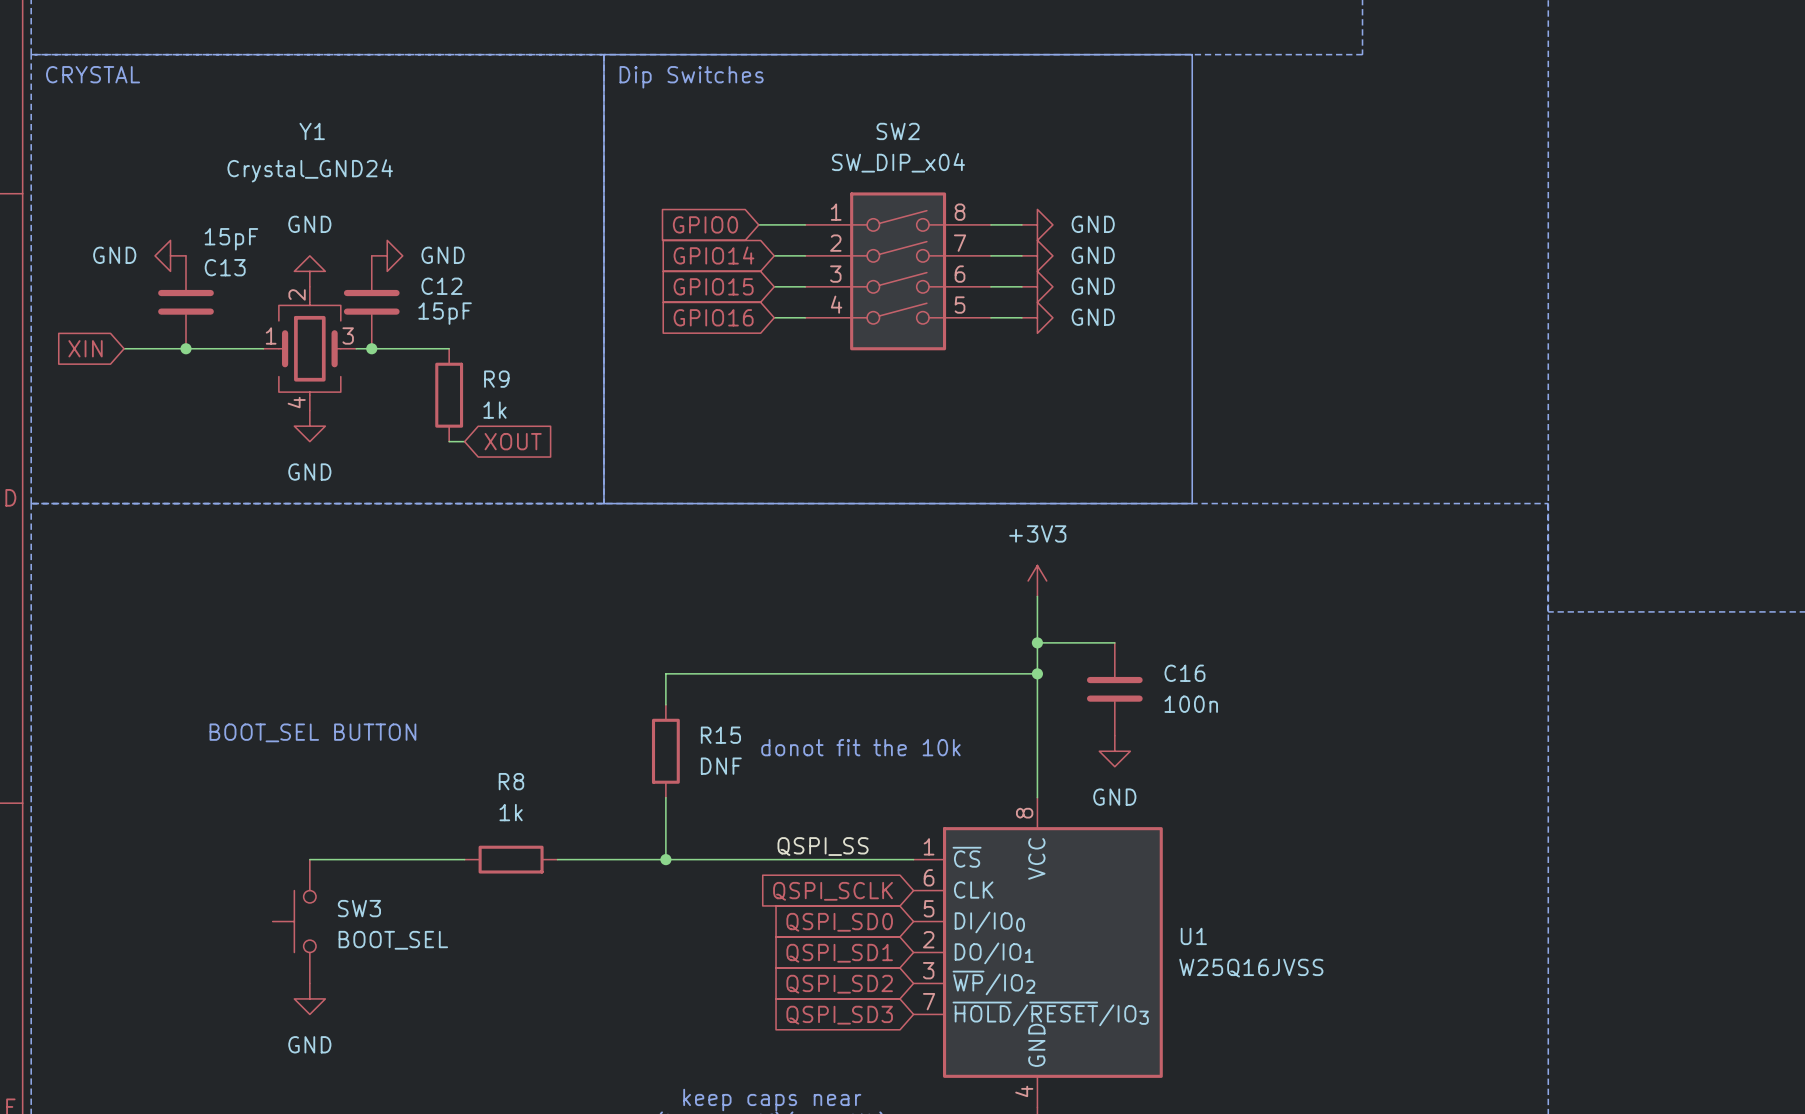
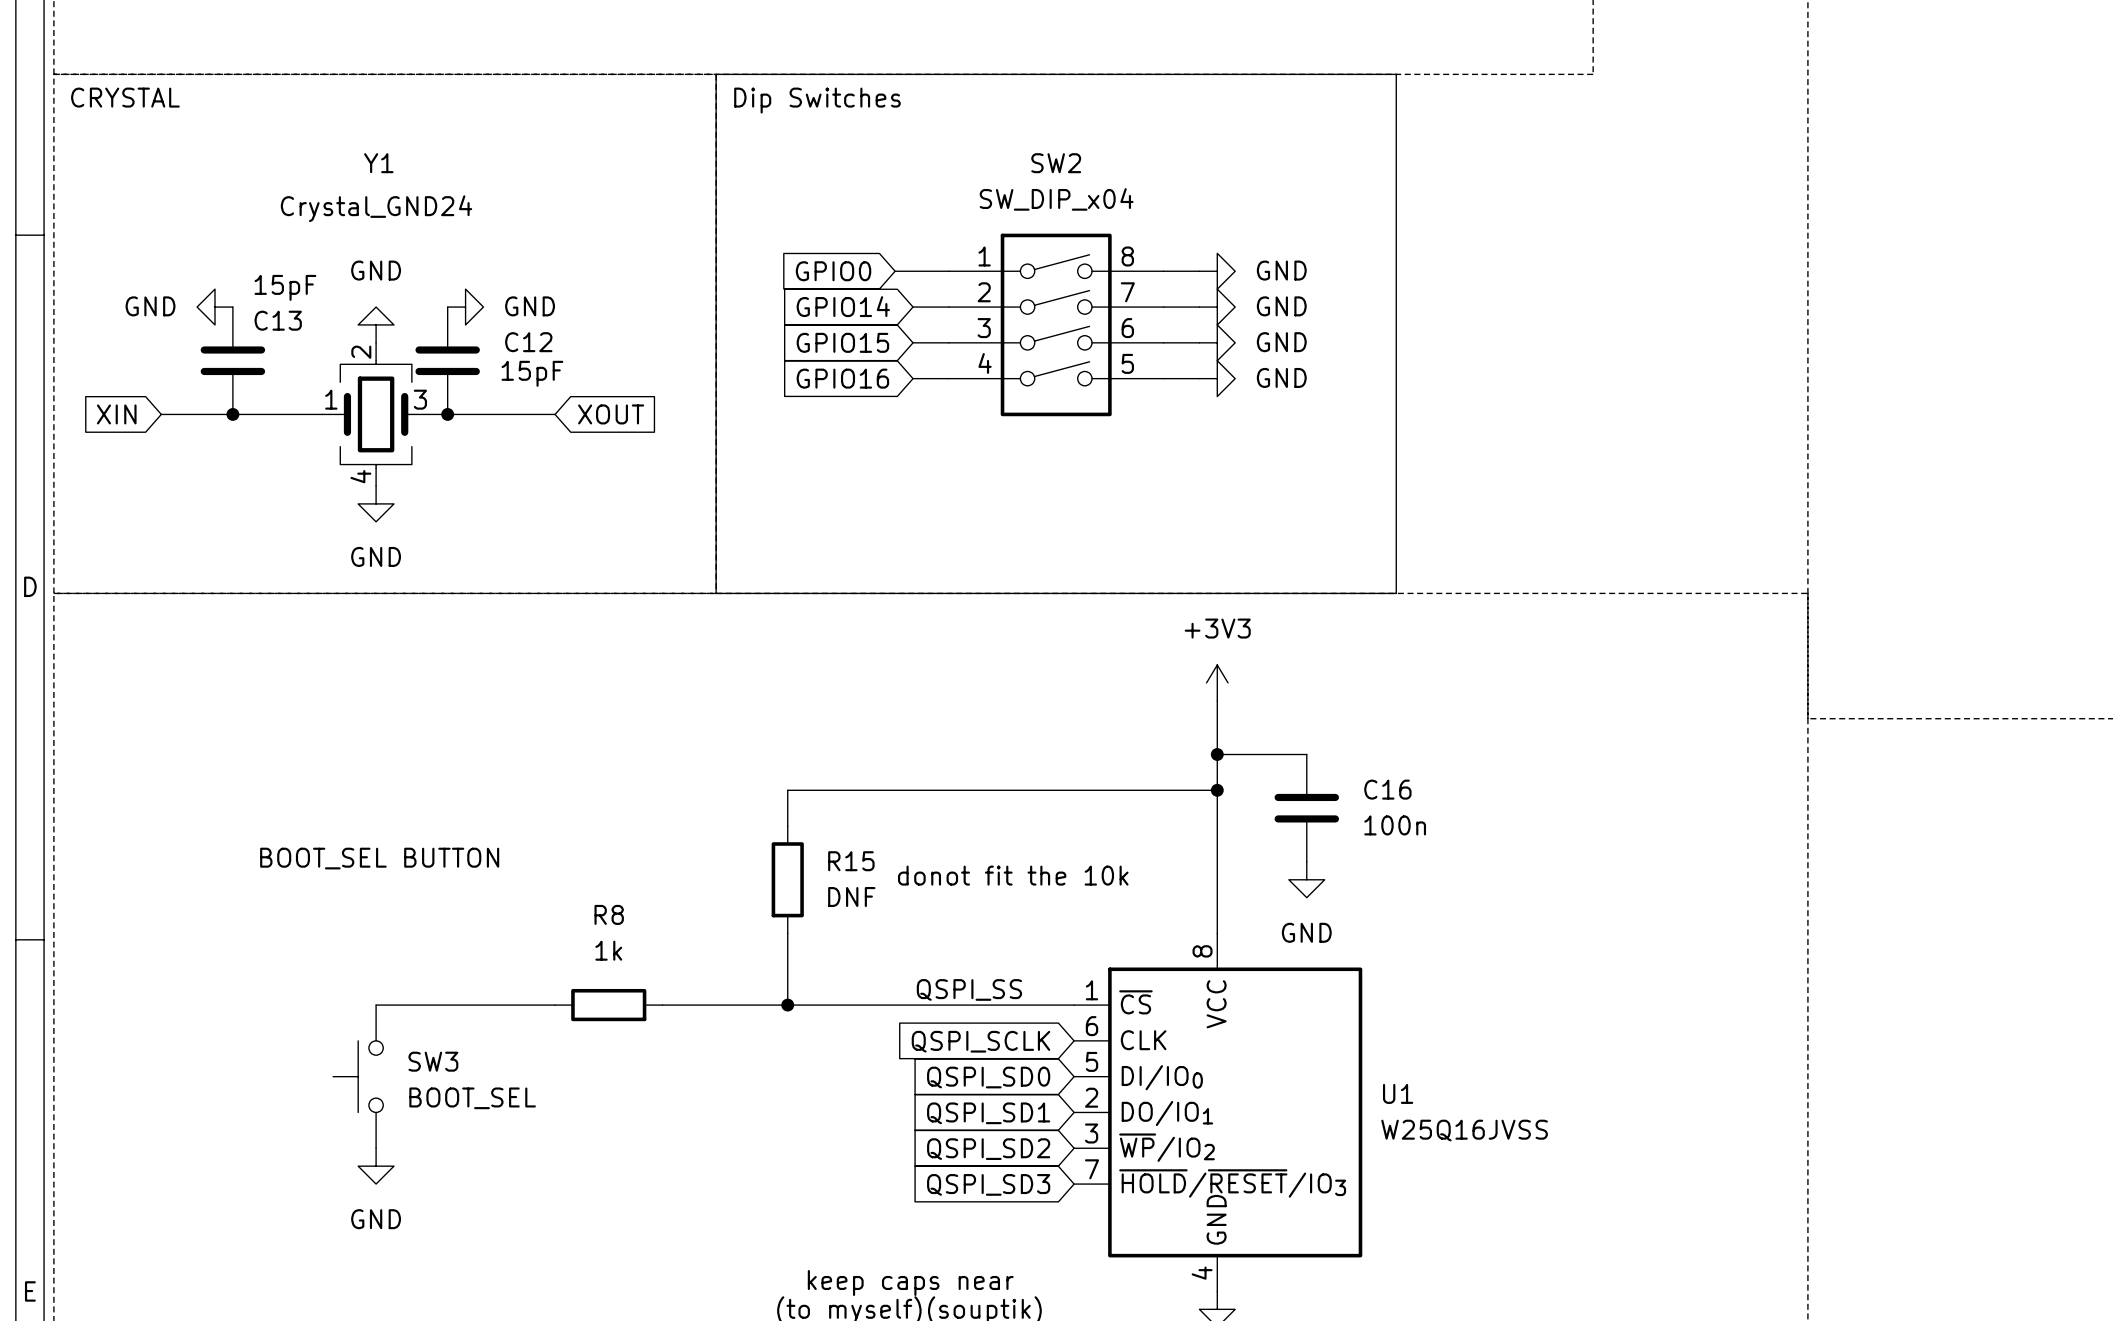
R9: 1k (449, 395) -> none
wire: (449, 441) (464, 441) -> (537, 414) (555, 414)
global label position: XOUT (513, 441) -> XOUT (611, 414)

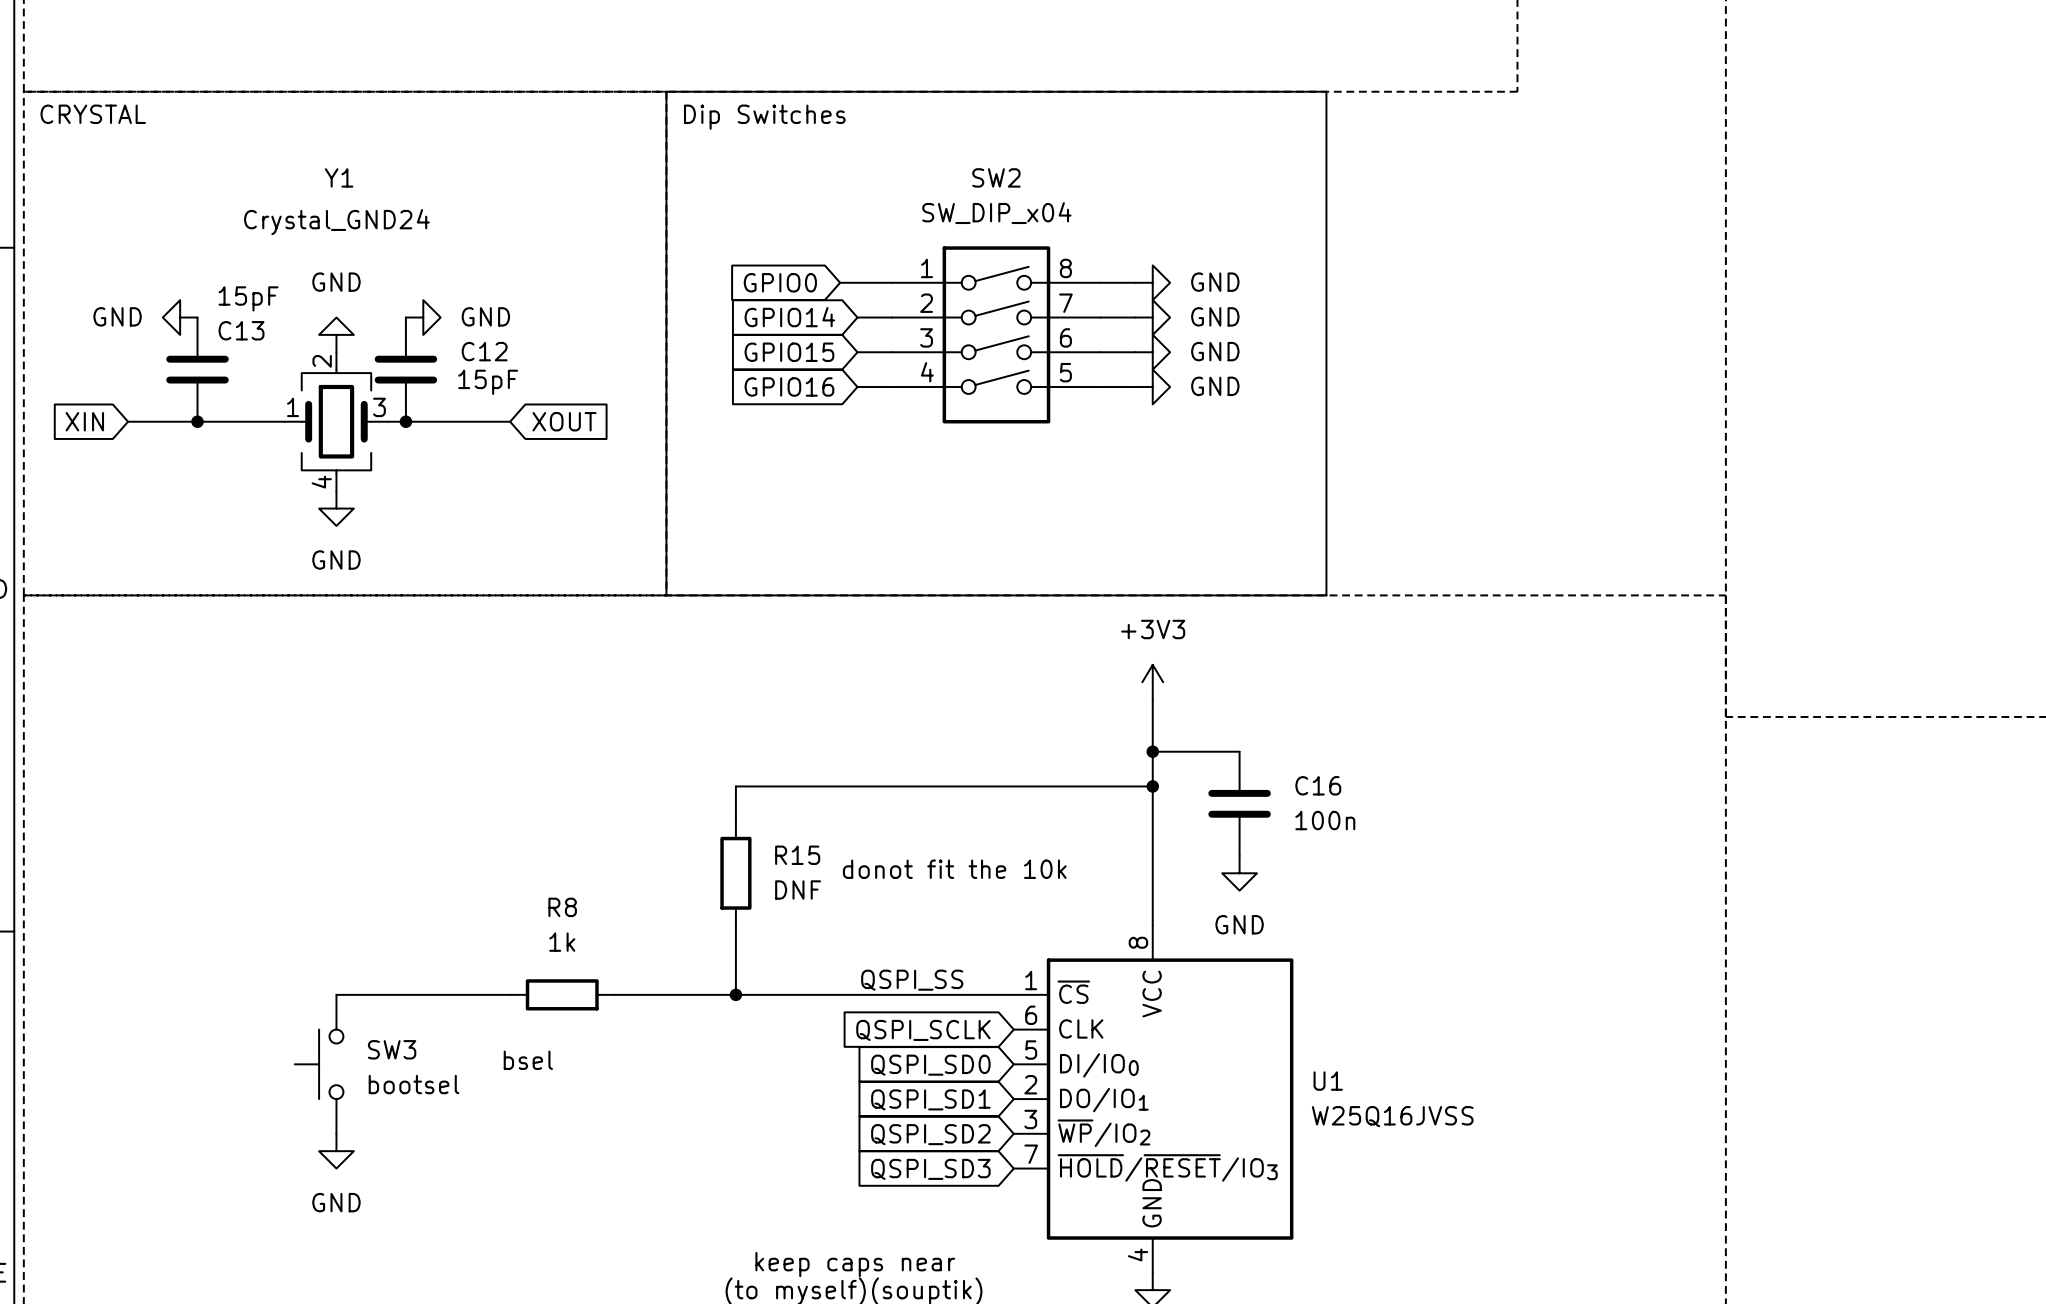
text: BOOT_SEL BUTTON (379, 858) -> none
text: none -> bsel (528, 1060)
SW3 value: BOOT_SEL (472, 1098) -> bootsel (414, 1084)

